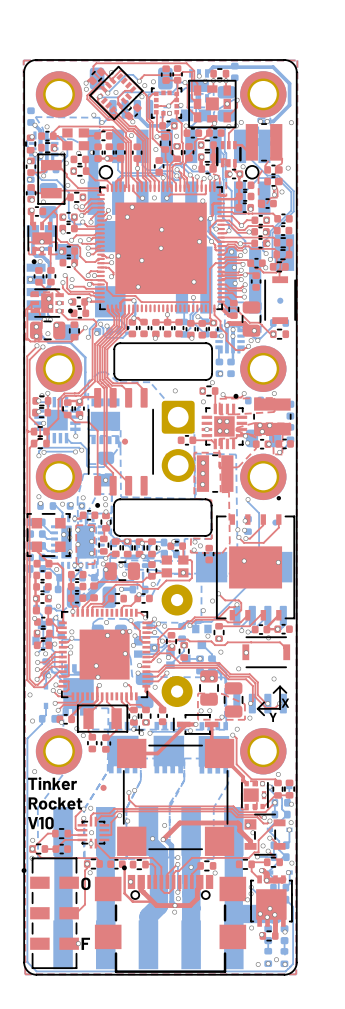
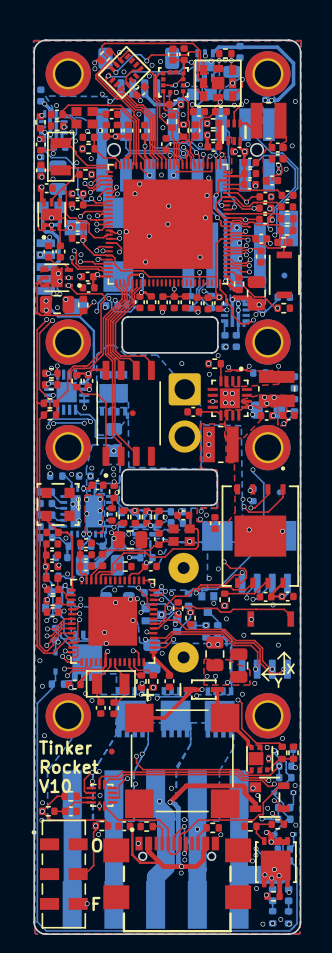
bottom track: (191, 146) (191, 135) (199, 127) (224, 129) (225, 177) (226, 185) (231, 190) (231, 227) (245, 241) (245, 251) -> none
via: (245, 251) -> none

